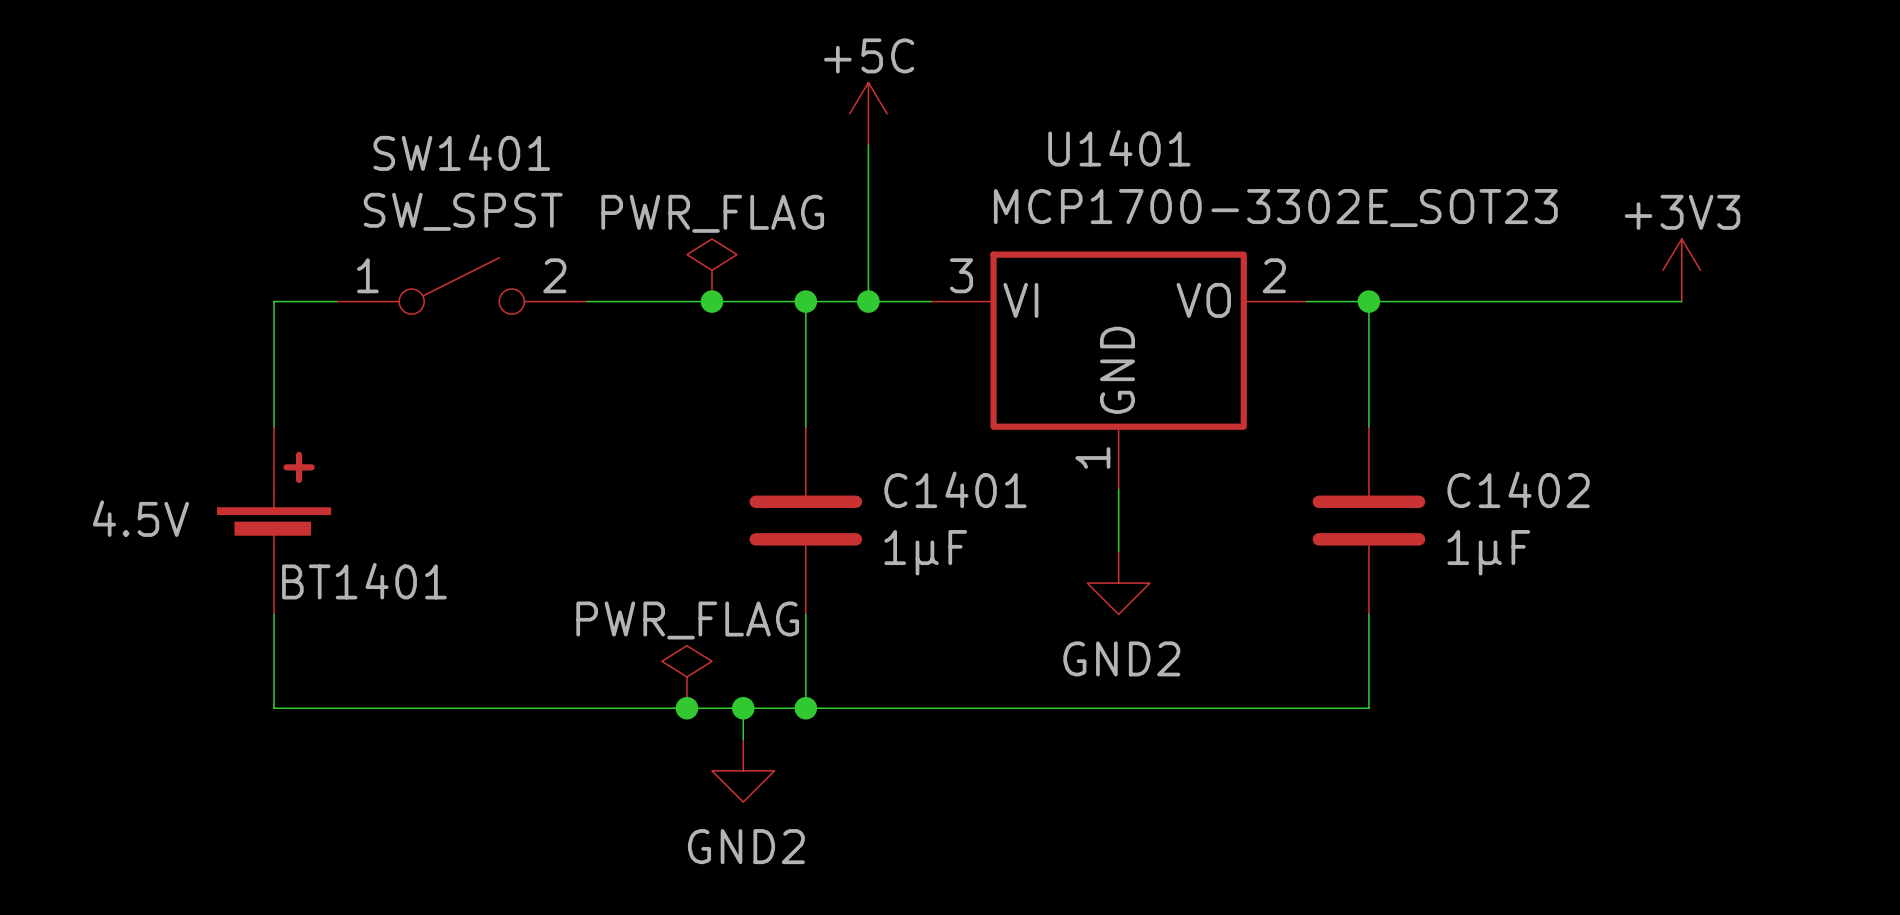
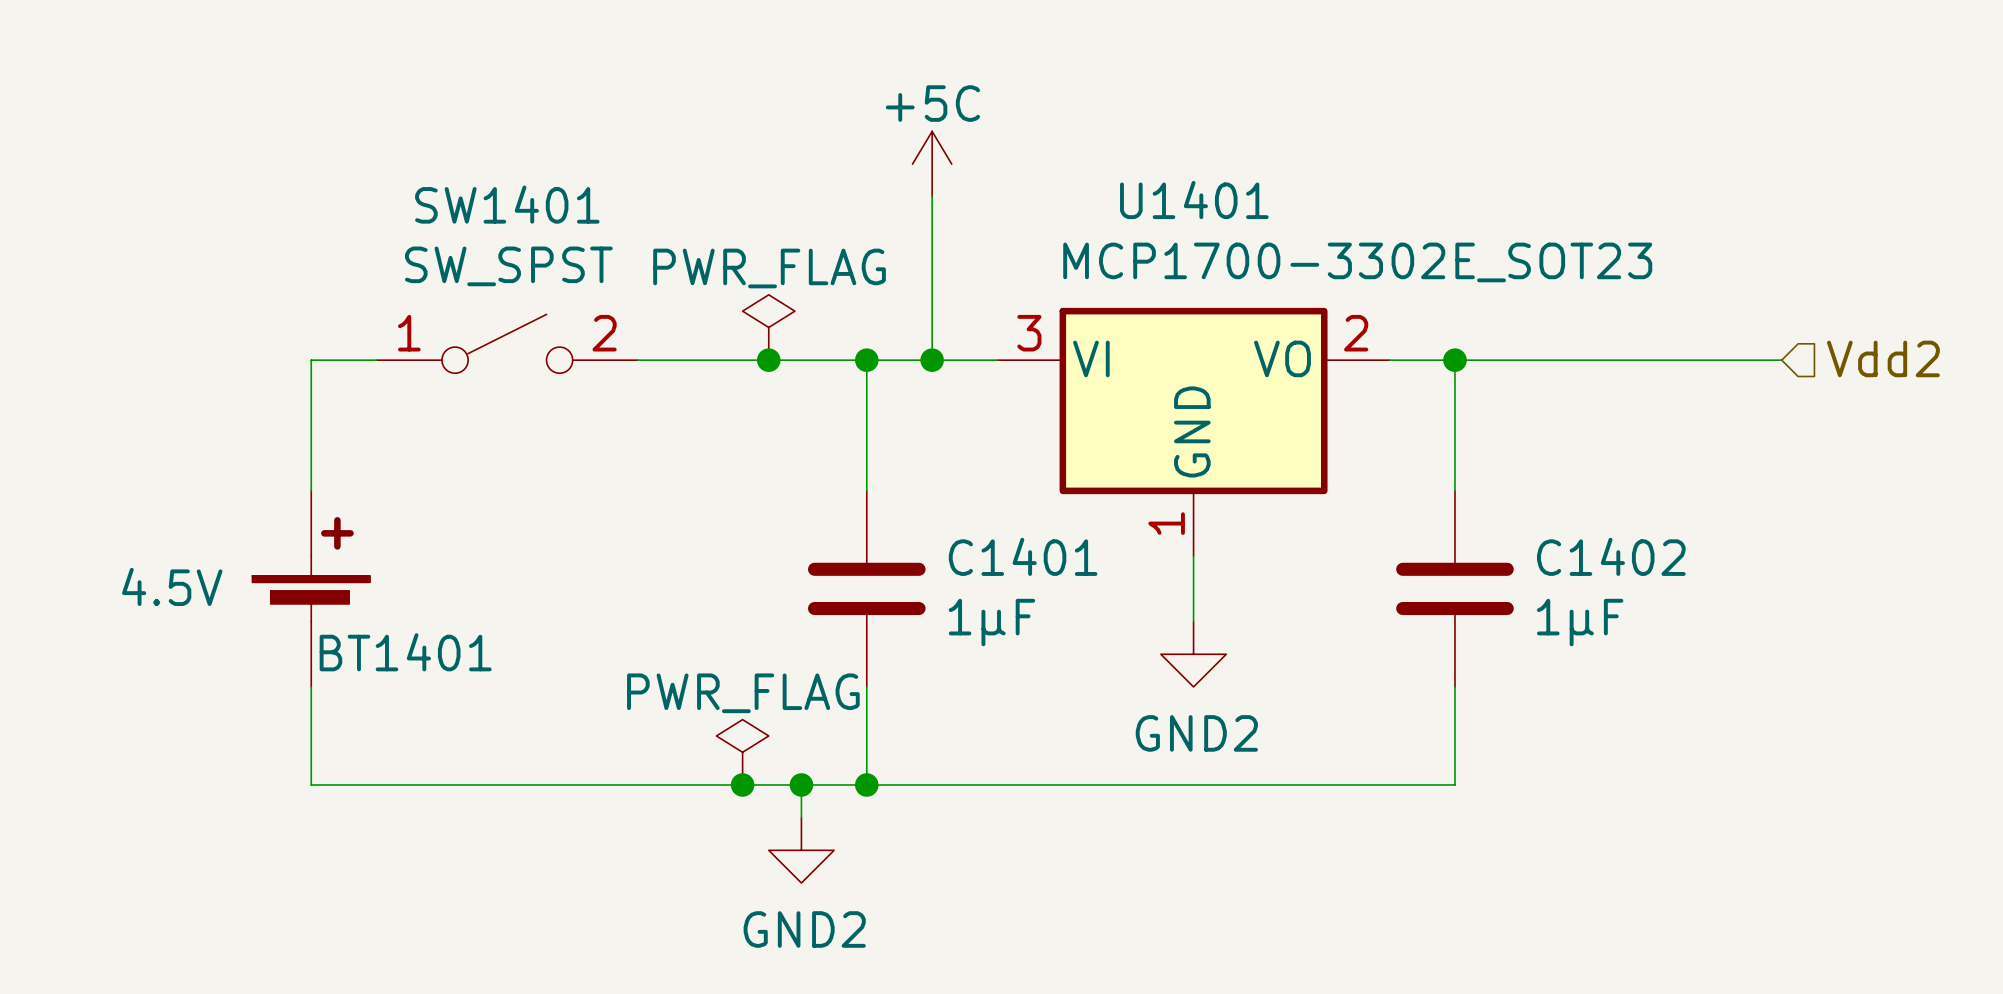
power symbol: +3V3 (1681, 270) -> none
hierarchical label: none -> Vdd2 (1883, 358)

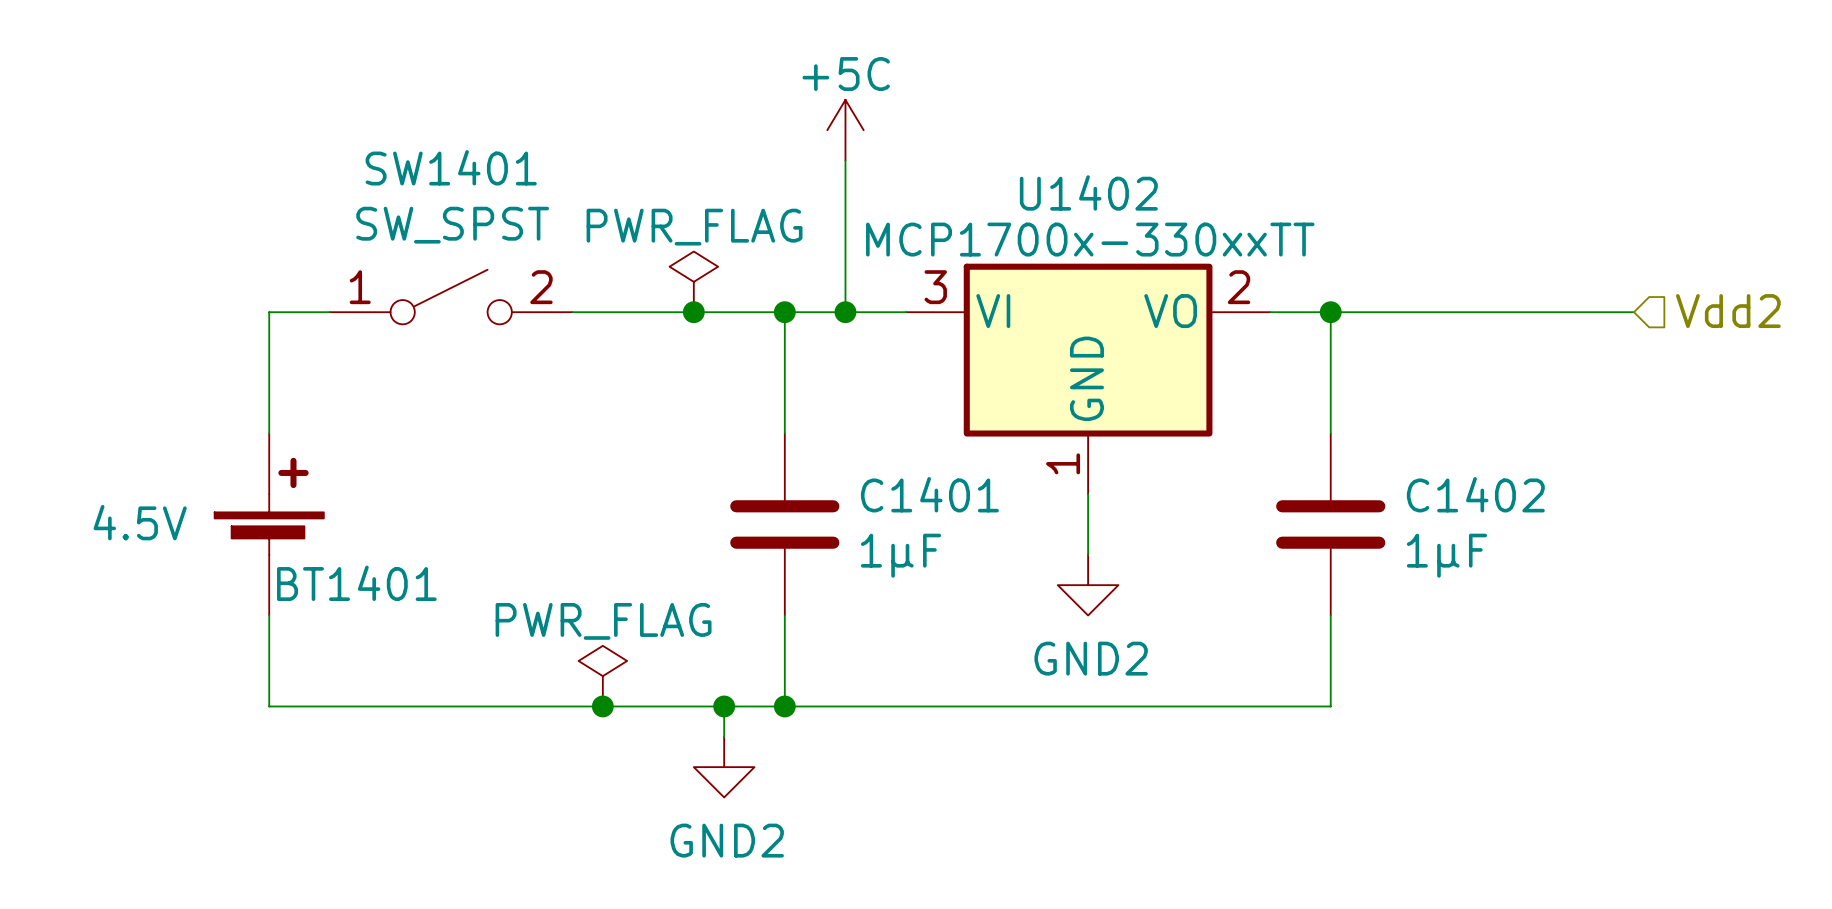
U1401 name: U1401 (1194, 200) -> U1402 (1088, 192)
U1401 value: MCP1700-3302E_SOT23 (1357, 262) -> MCP1700x-330xxTT (1090, 239)
power symbol position: PWR_FLAG (742, 752) -> PWR_FLAG (602, 676)
junction position: (742, 784) -> (602, 706)

